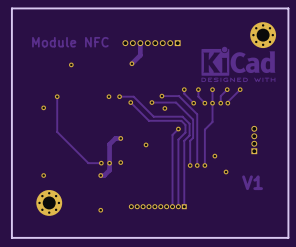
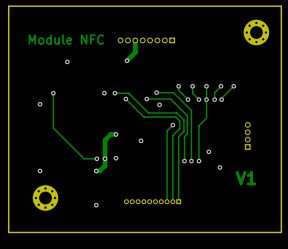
drawing: [201, 46, 276, 83] -> none

